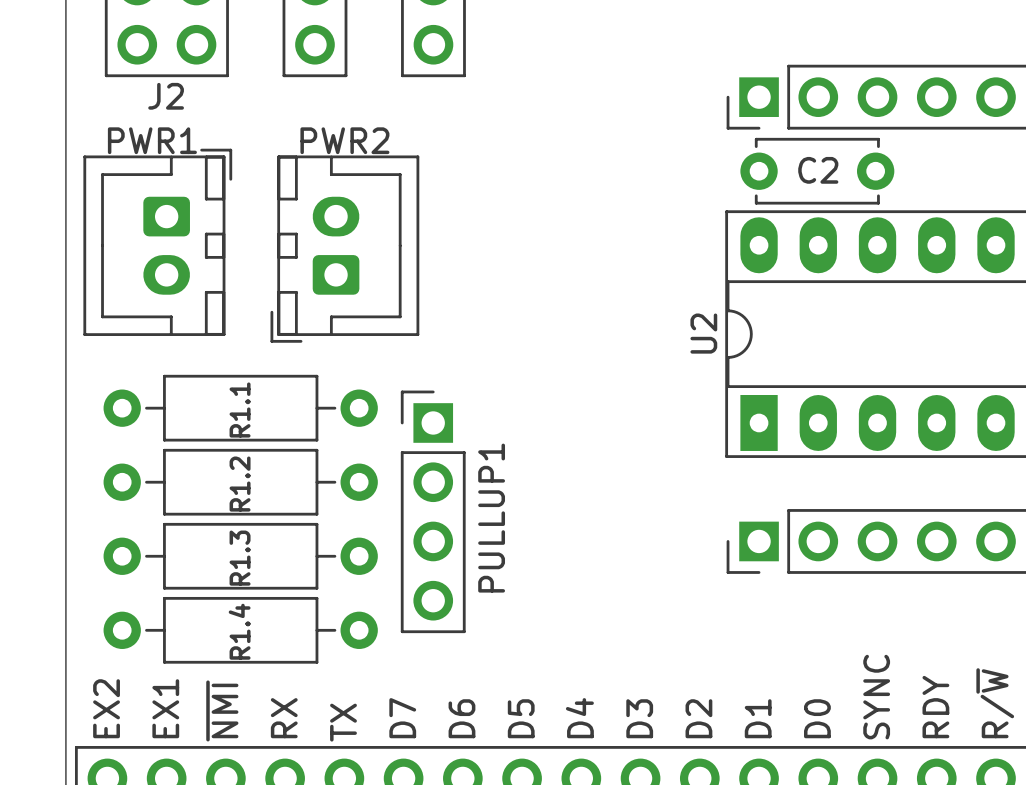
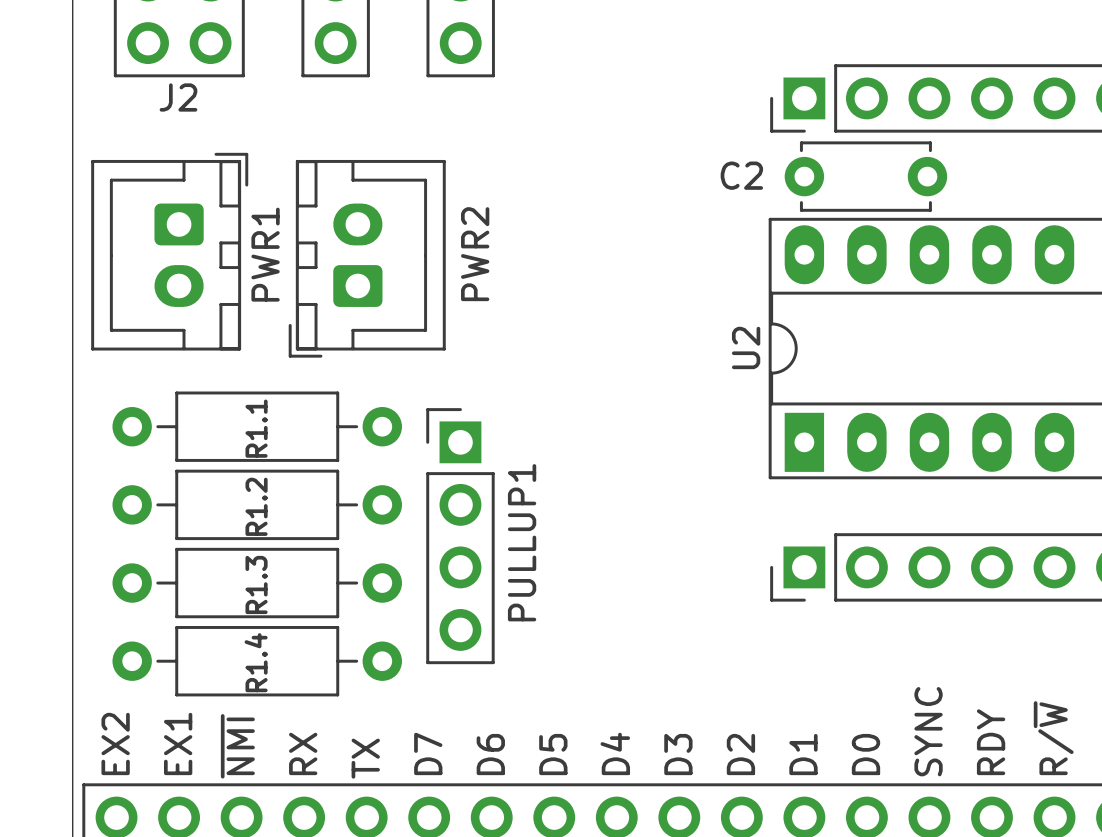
PWR1 name rotation: 0° (152, 140) -> 90° counterclockwise (265, 254)
PWR1 name position: PWR1 (152, 140) -> PWR1 (265, 254)
PWR2 name rotation: 0° (344, 140) -> 90° counterclockwise (475, 254)
PWR2 name position: PWR2 (344, 140) -> PWR2 (475, 254)
C2 name position: C2 (818, 170) -> C2 (741, 175)

